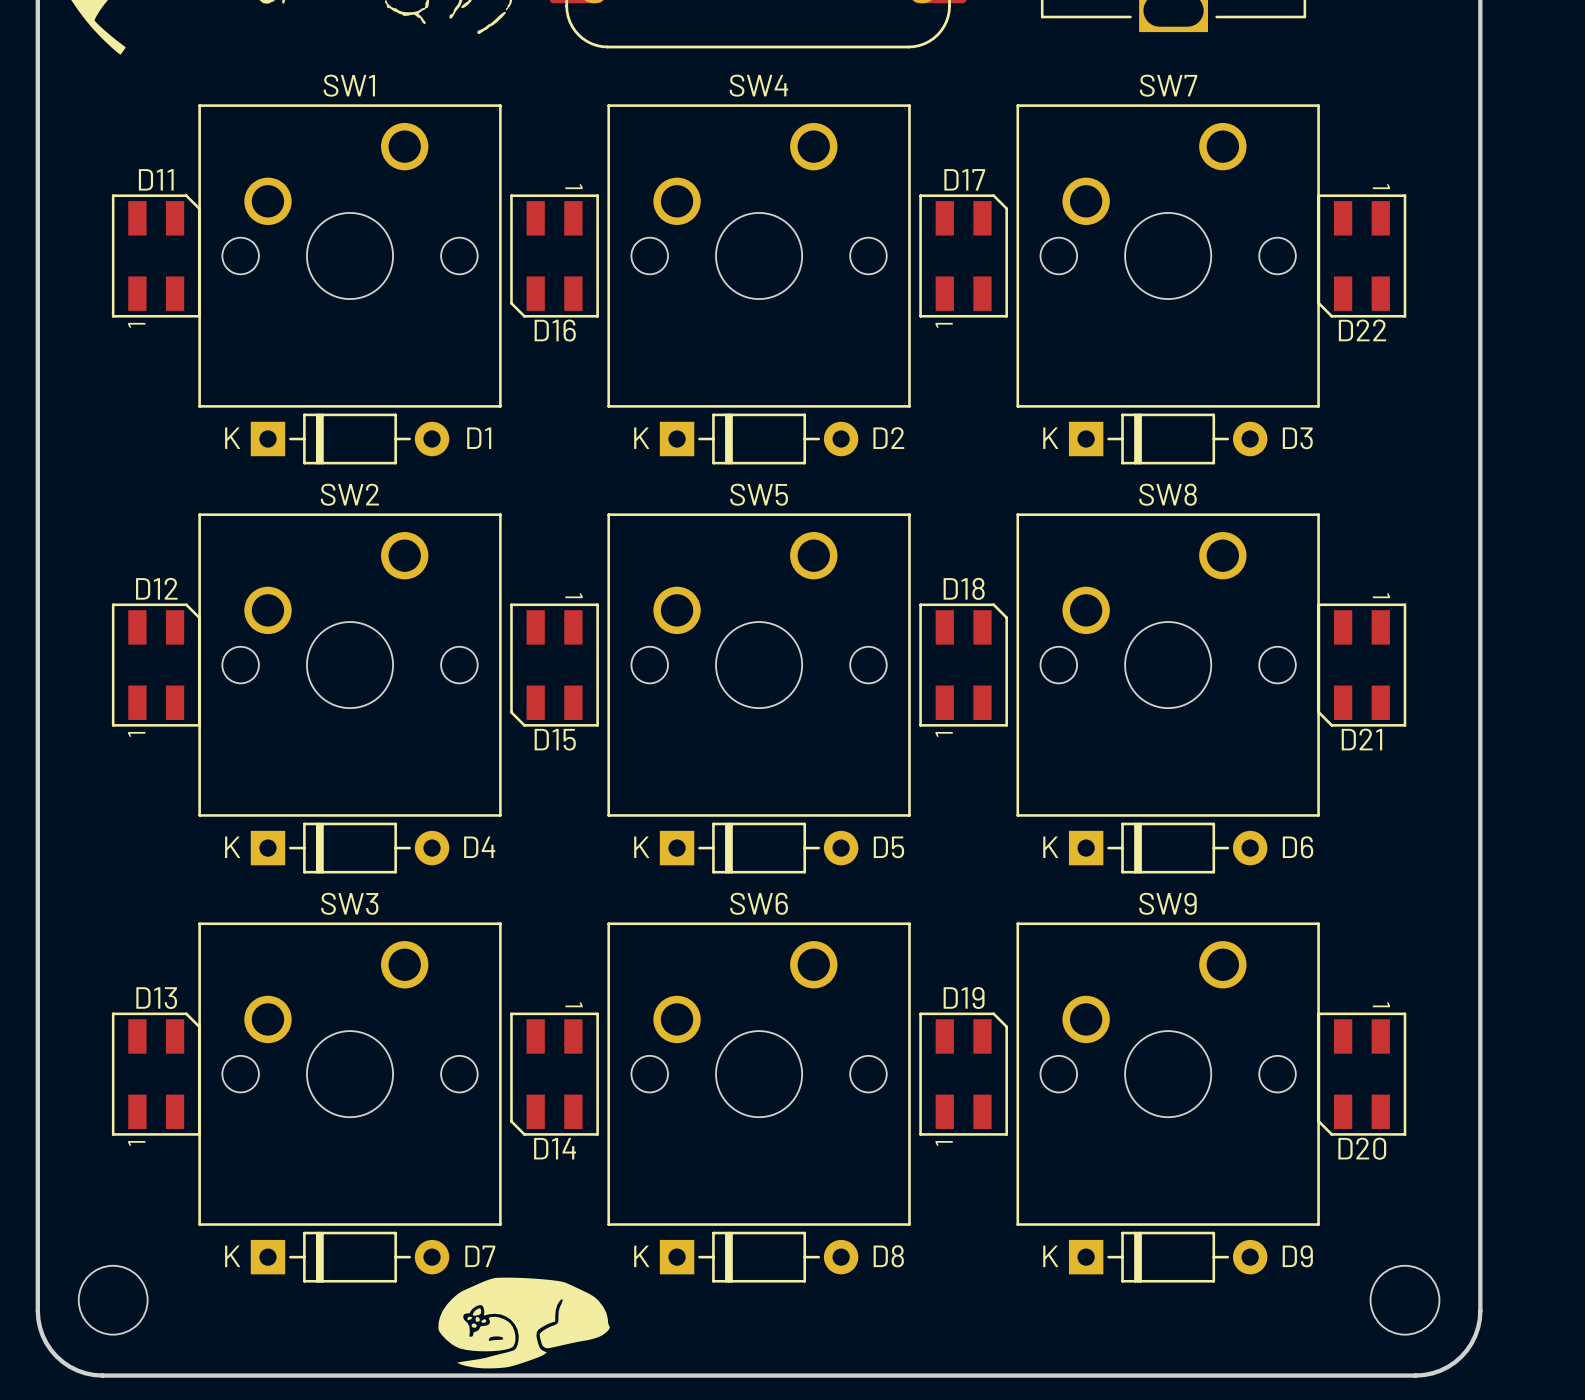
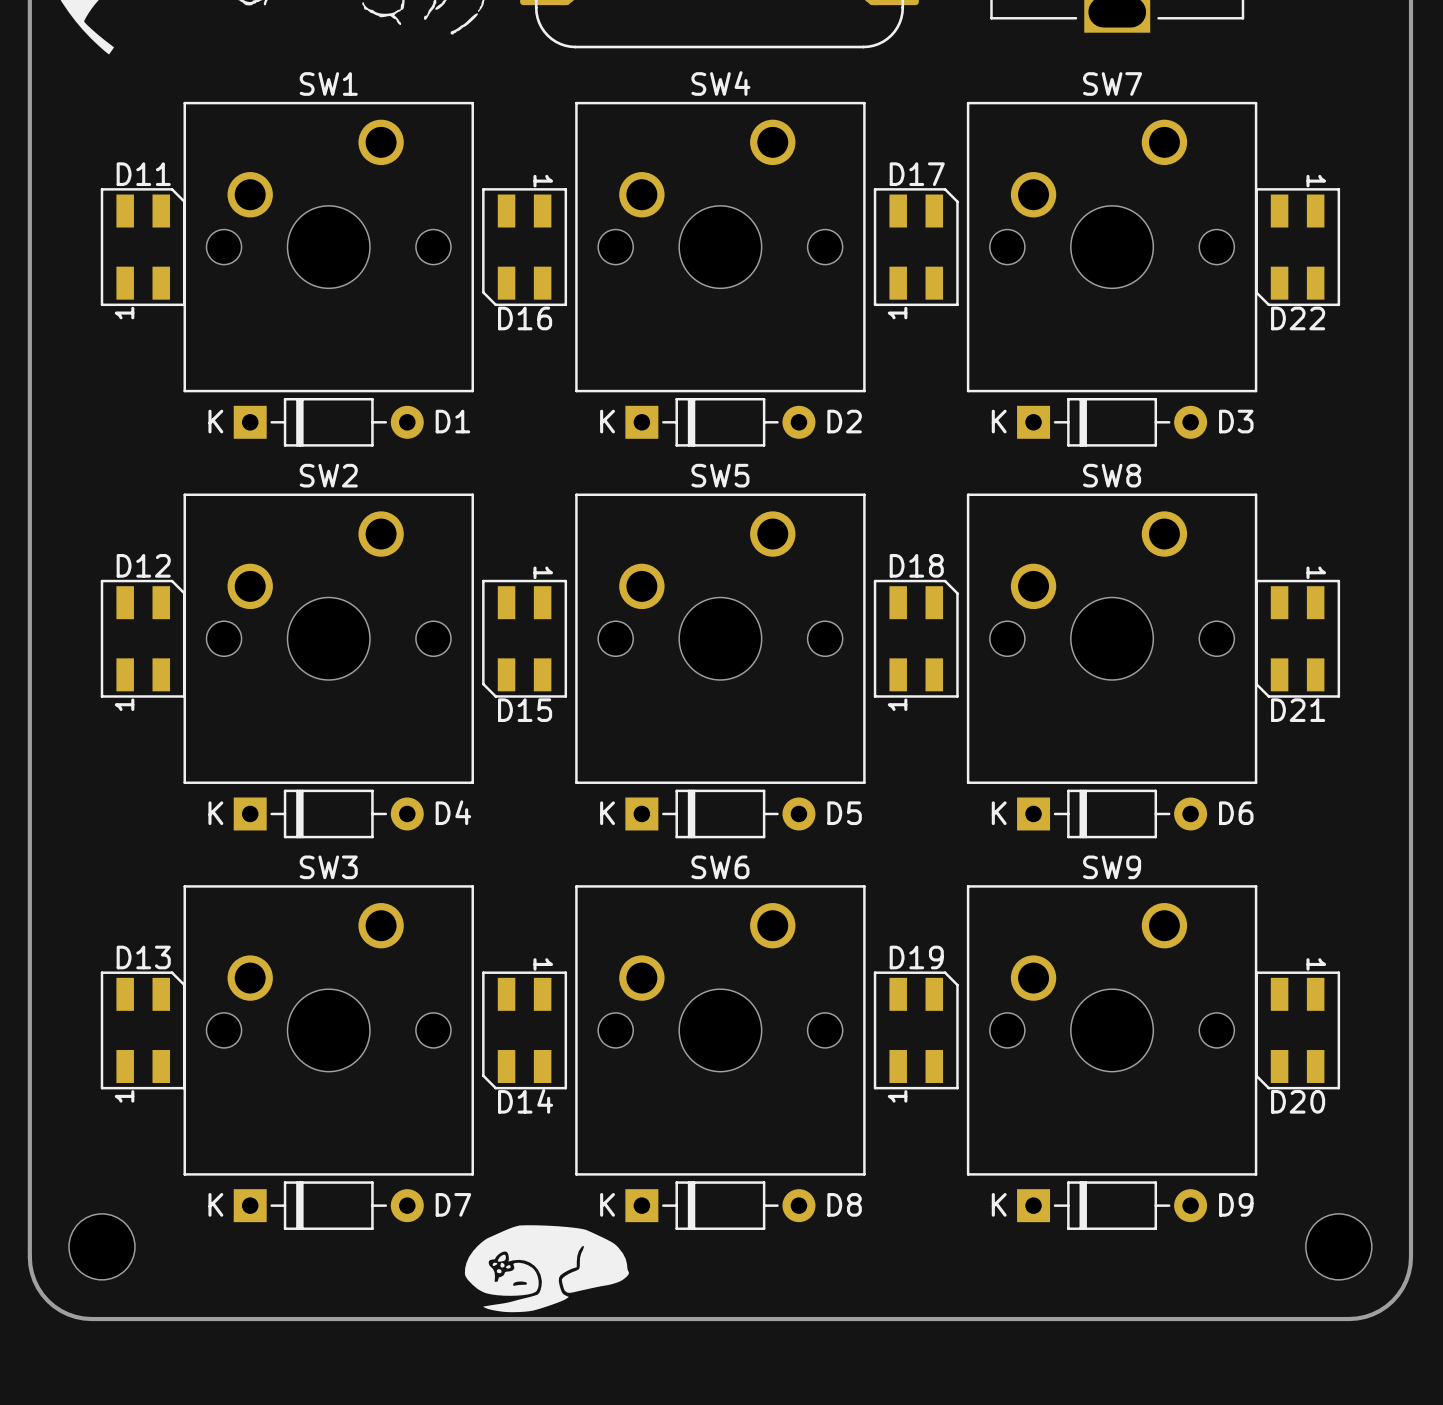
drawing position: (524, 1323) -> (546, 1268)

